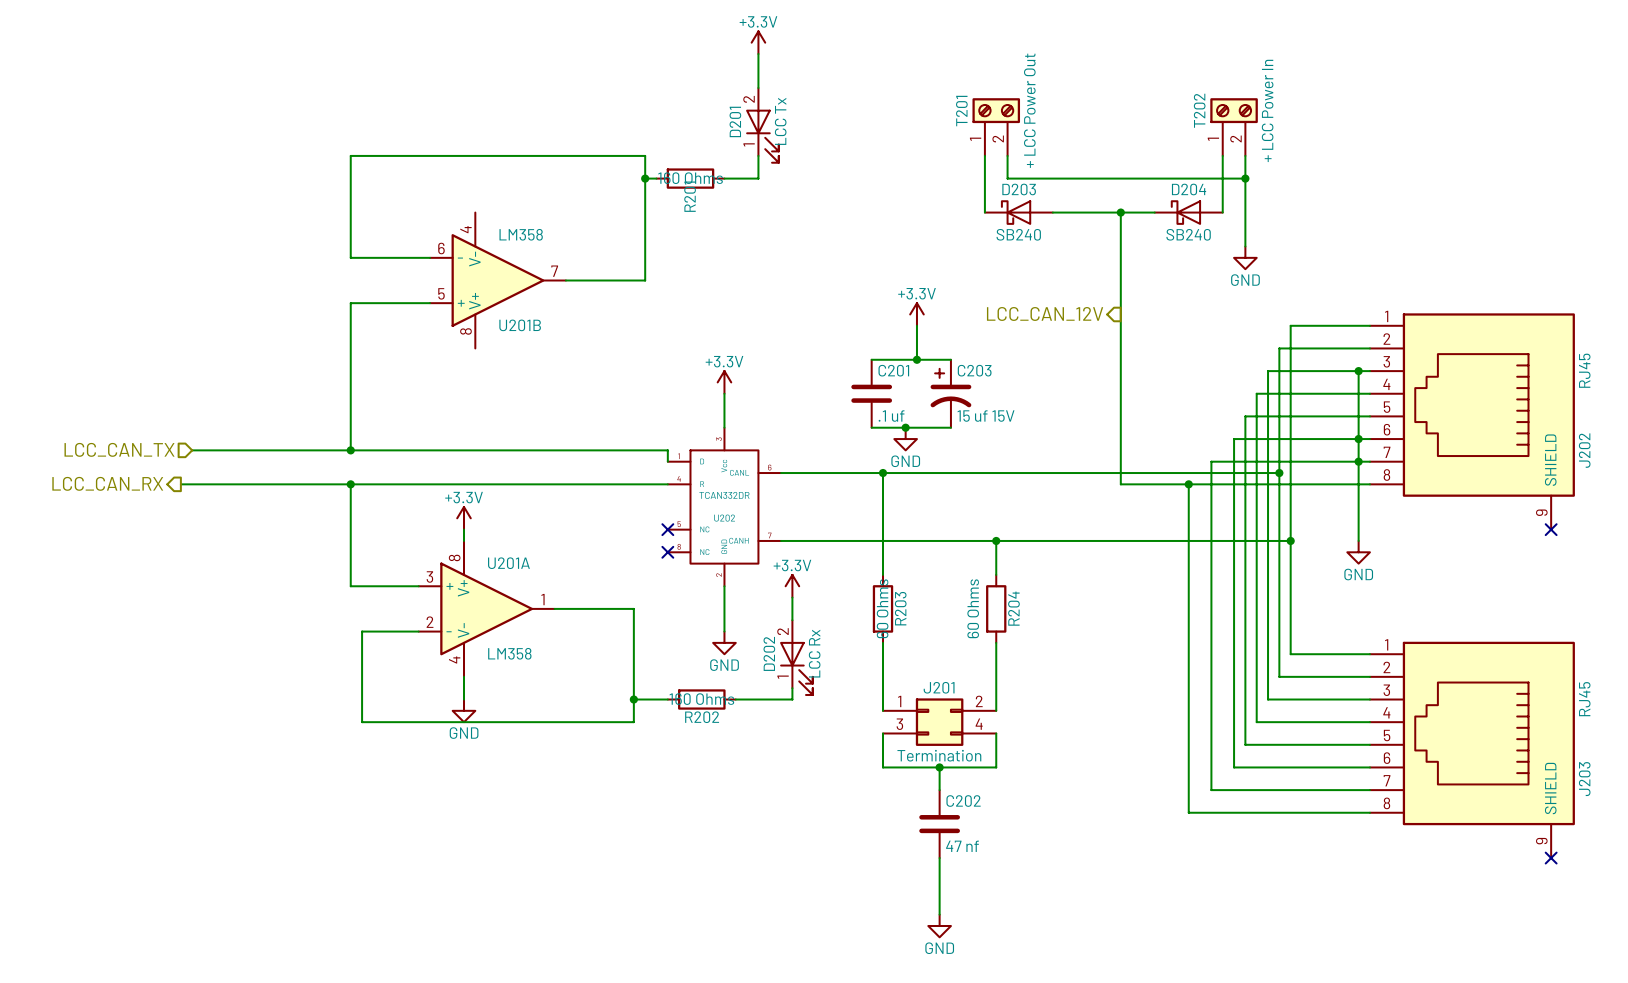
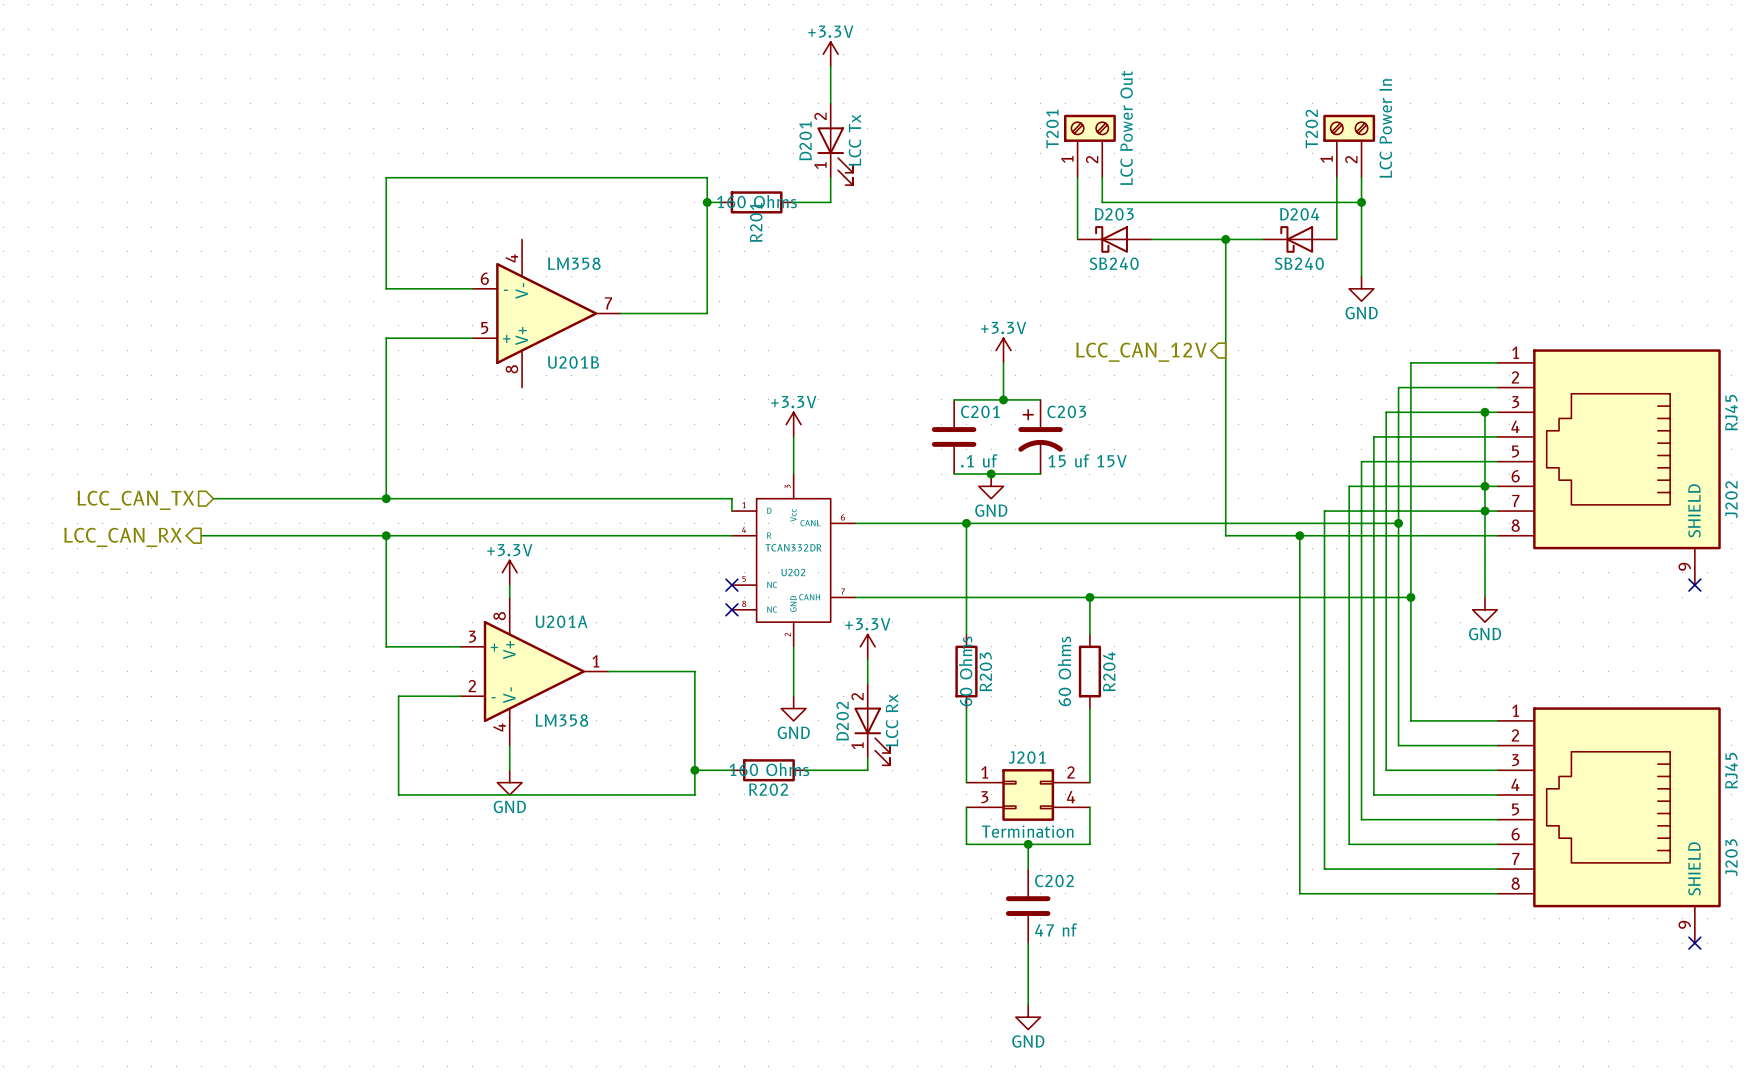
T201 value: + LCC Power Out (1029, 110) -> LCC Power Out (1126, 127)
T202 value: + LCC Power In (1267, 110) -> LCC Power In (1385, 128)

